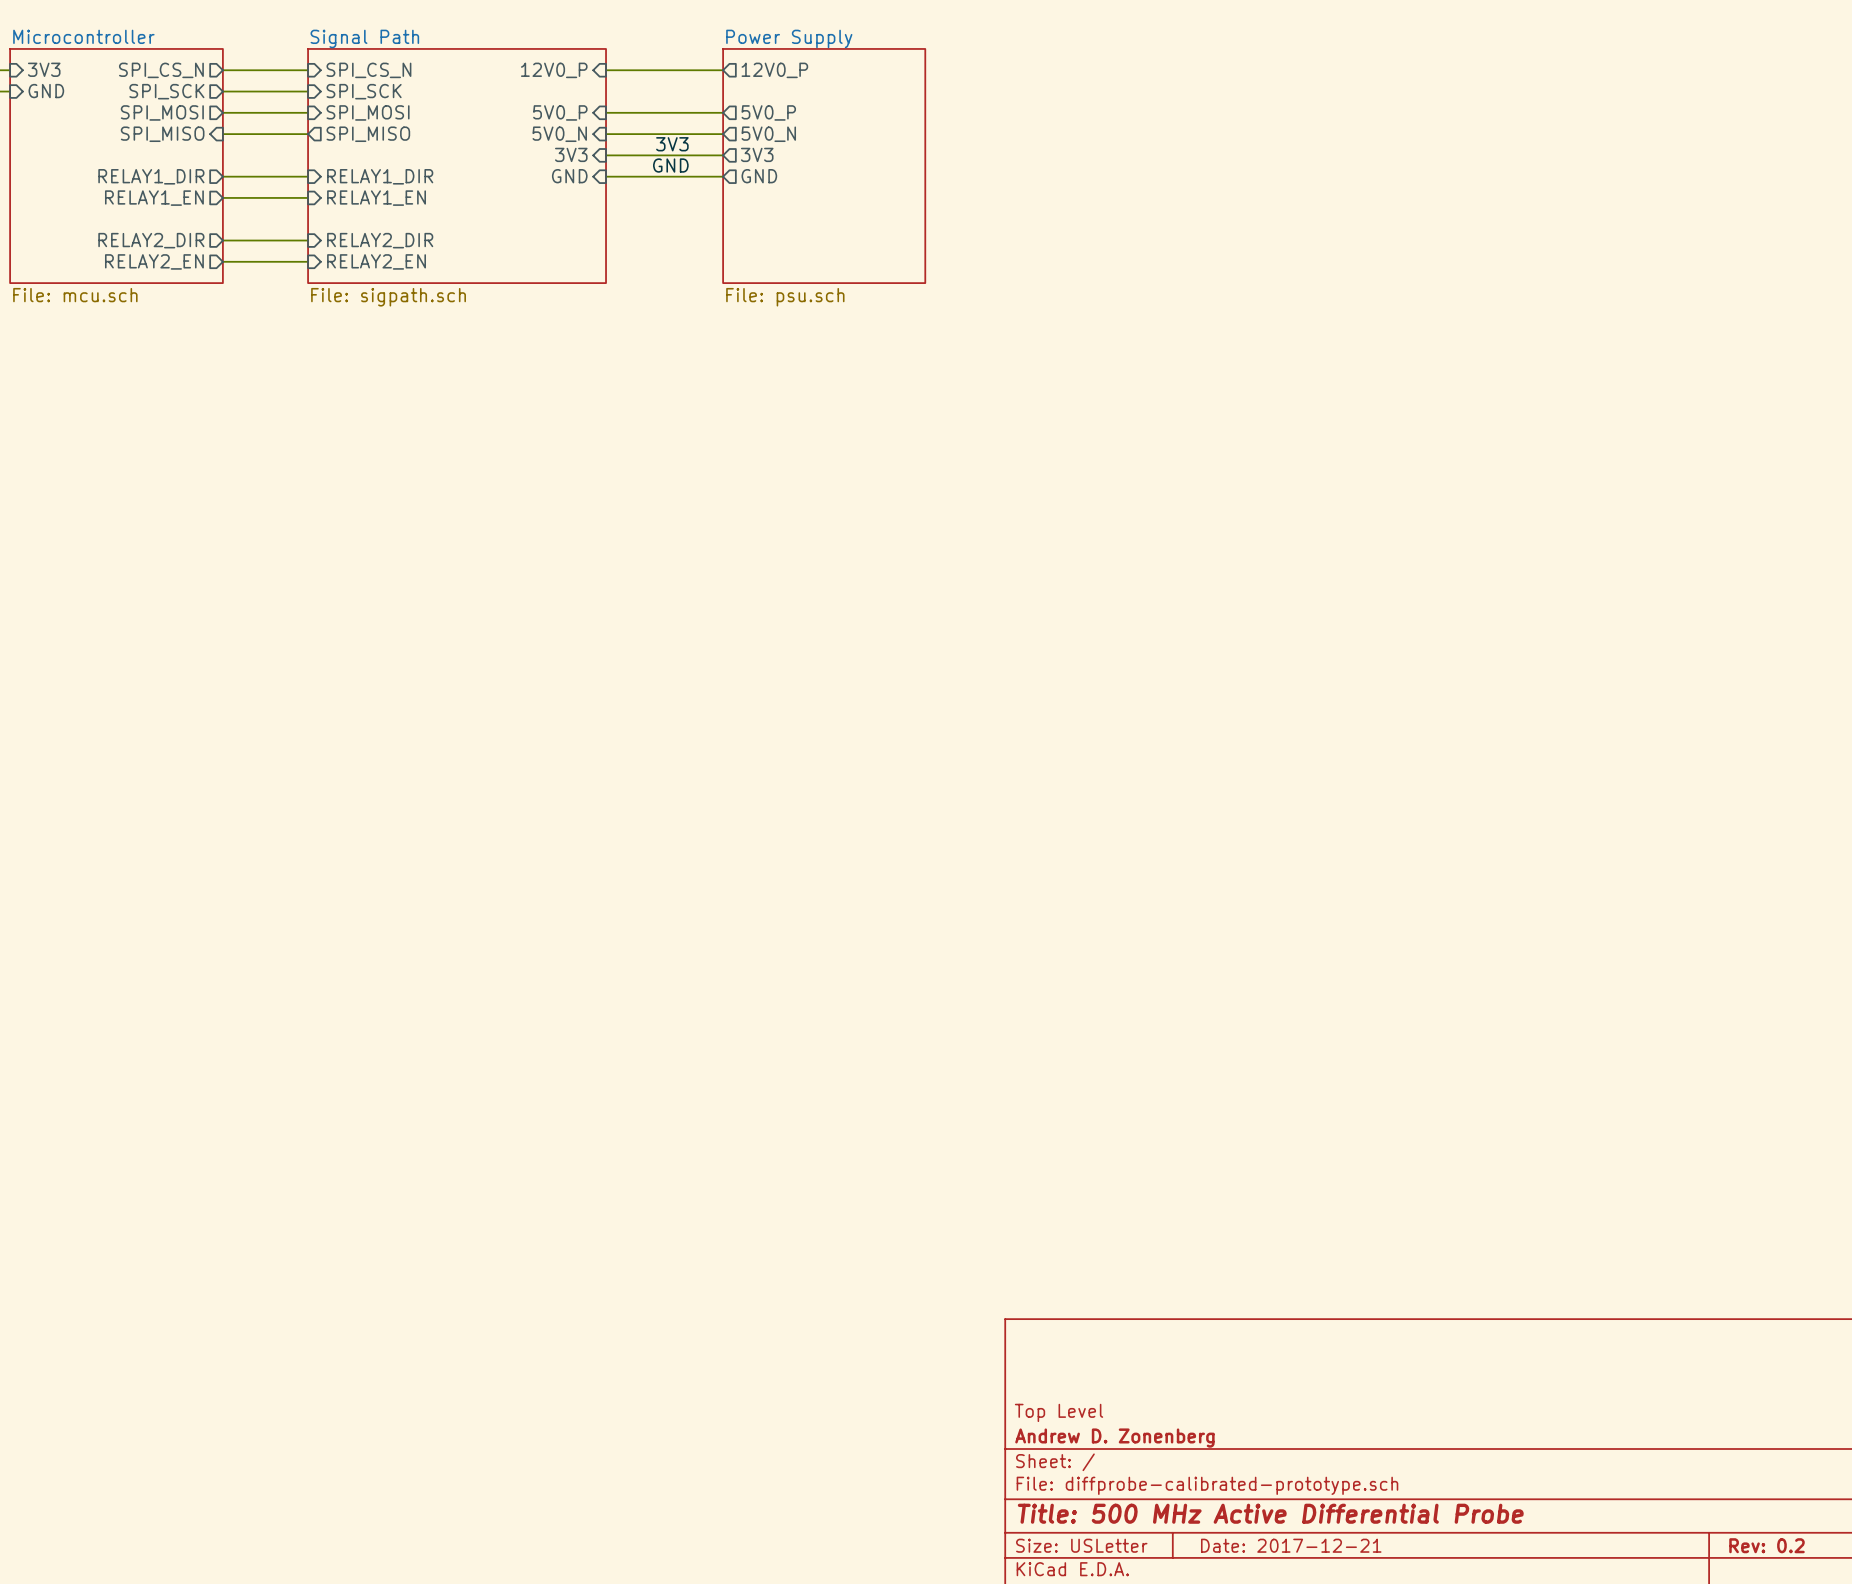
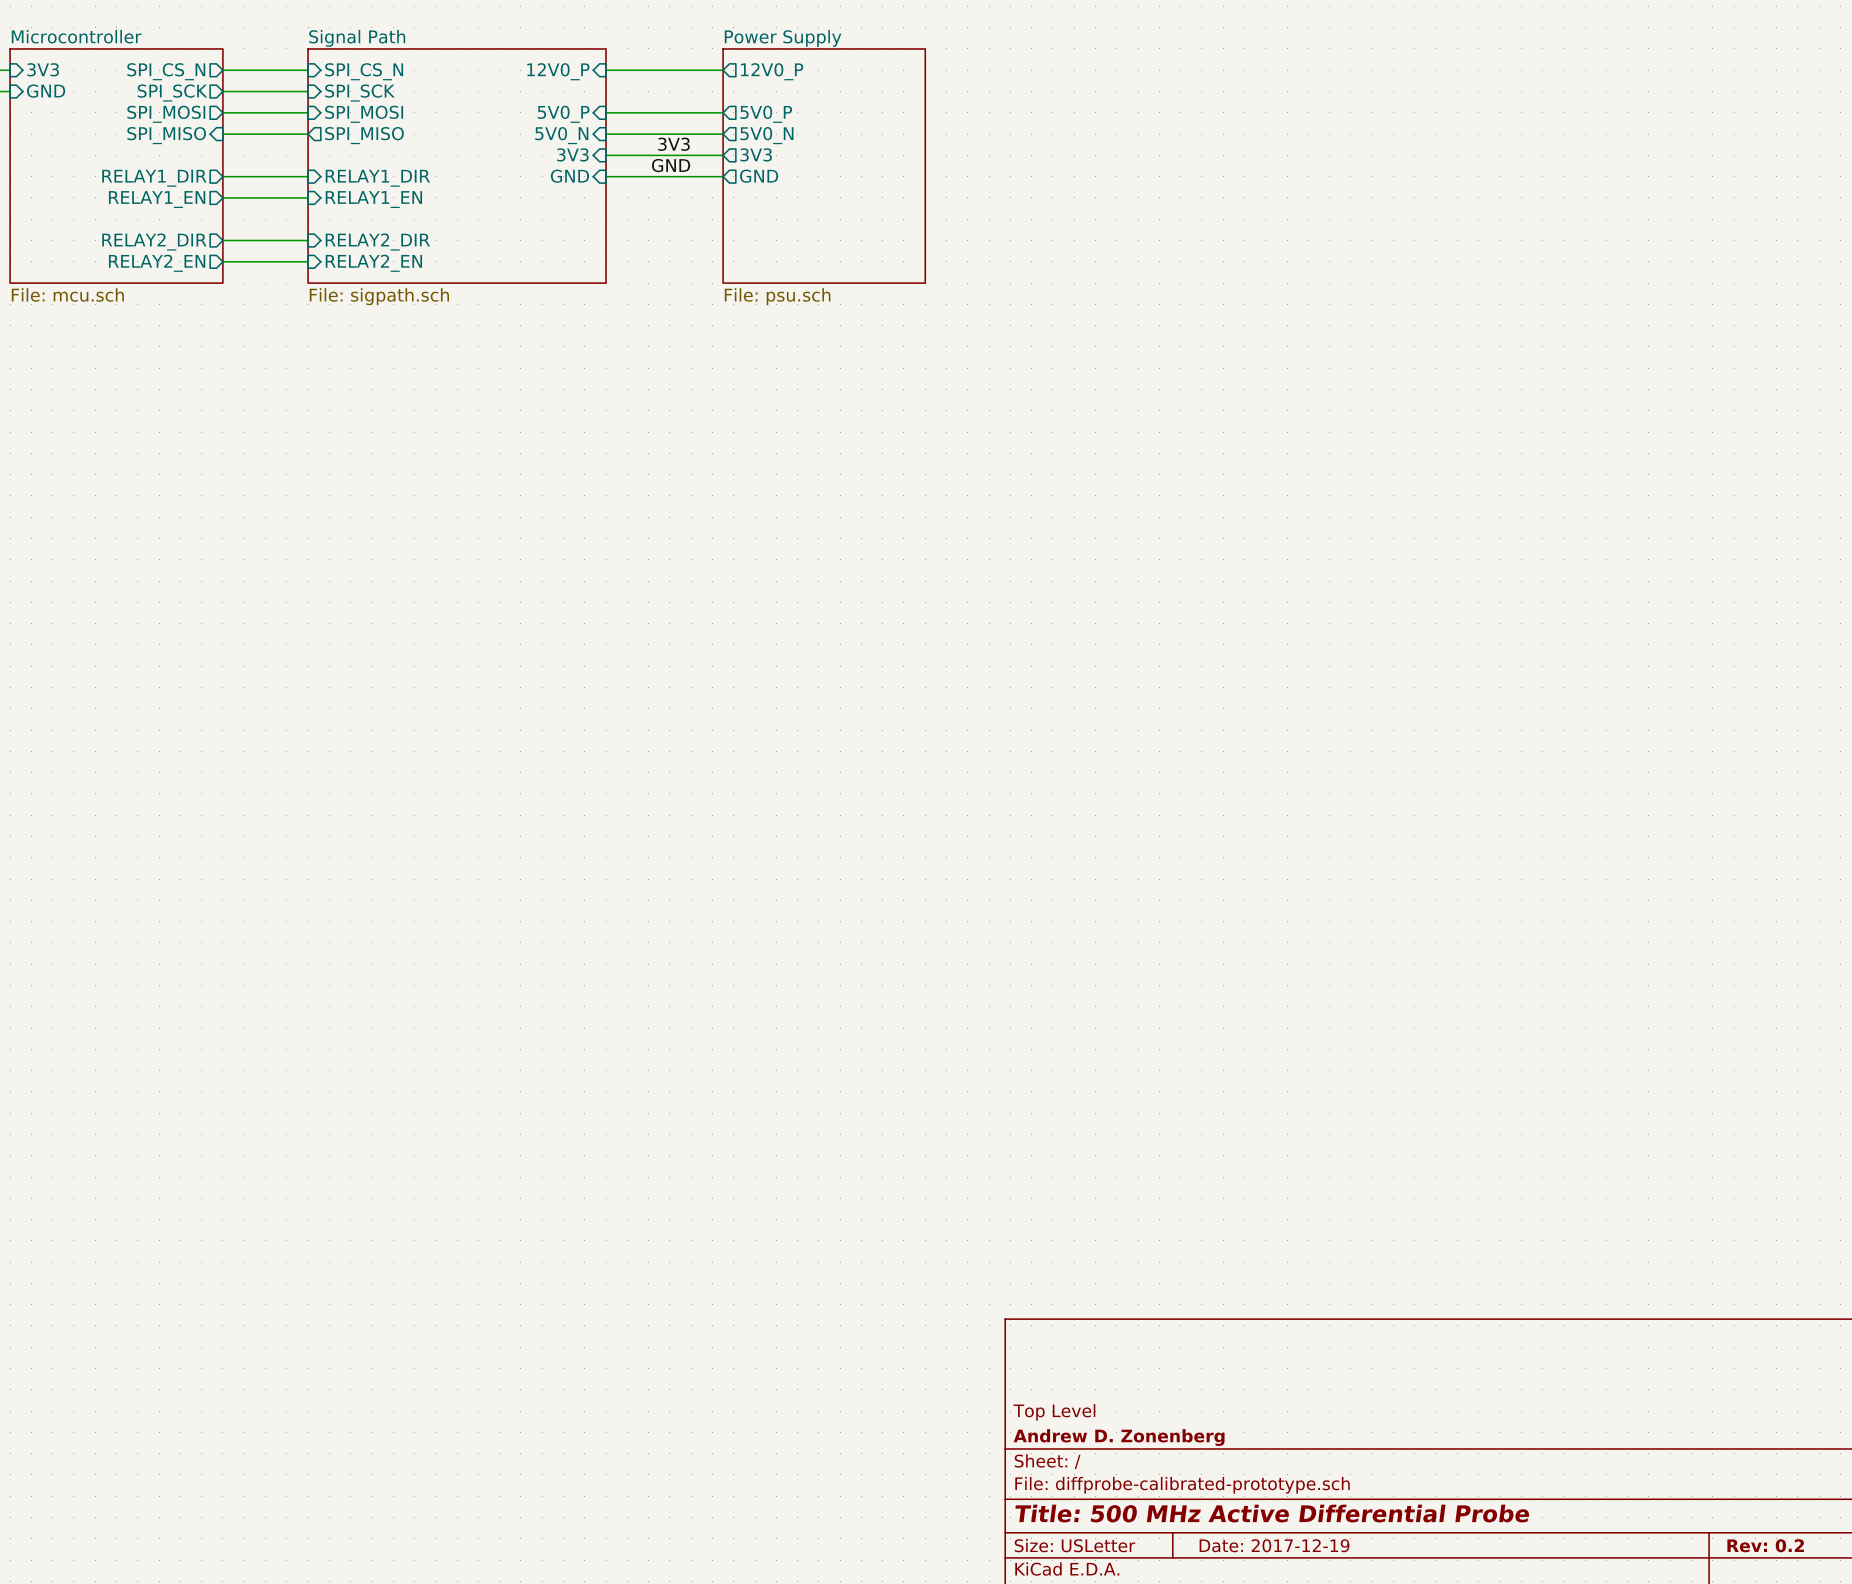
title block: Date: 2017-12-21 (1291, 1545) -> Date: 2017-12-19 (1274, 1545)

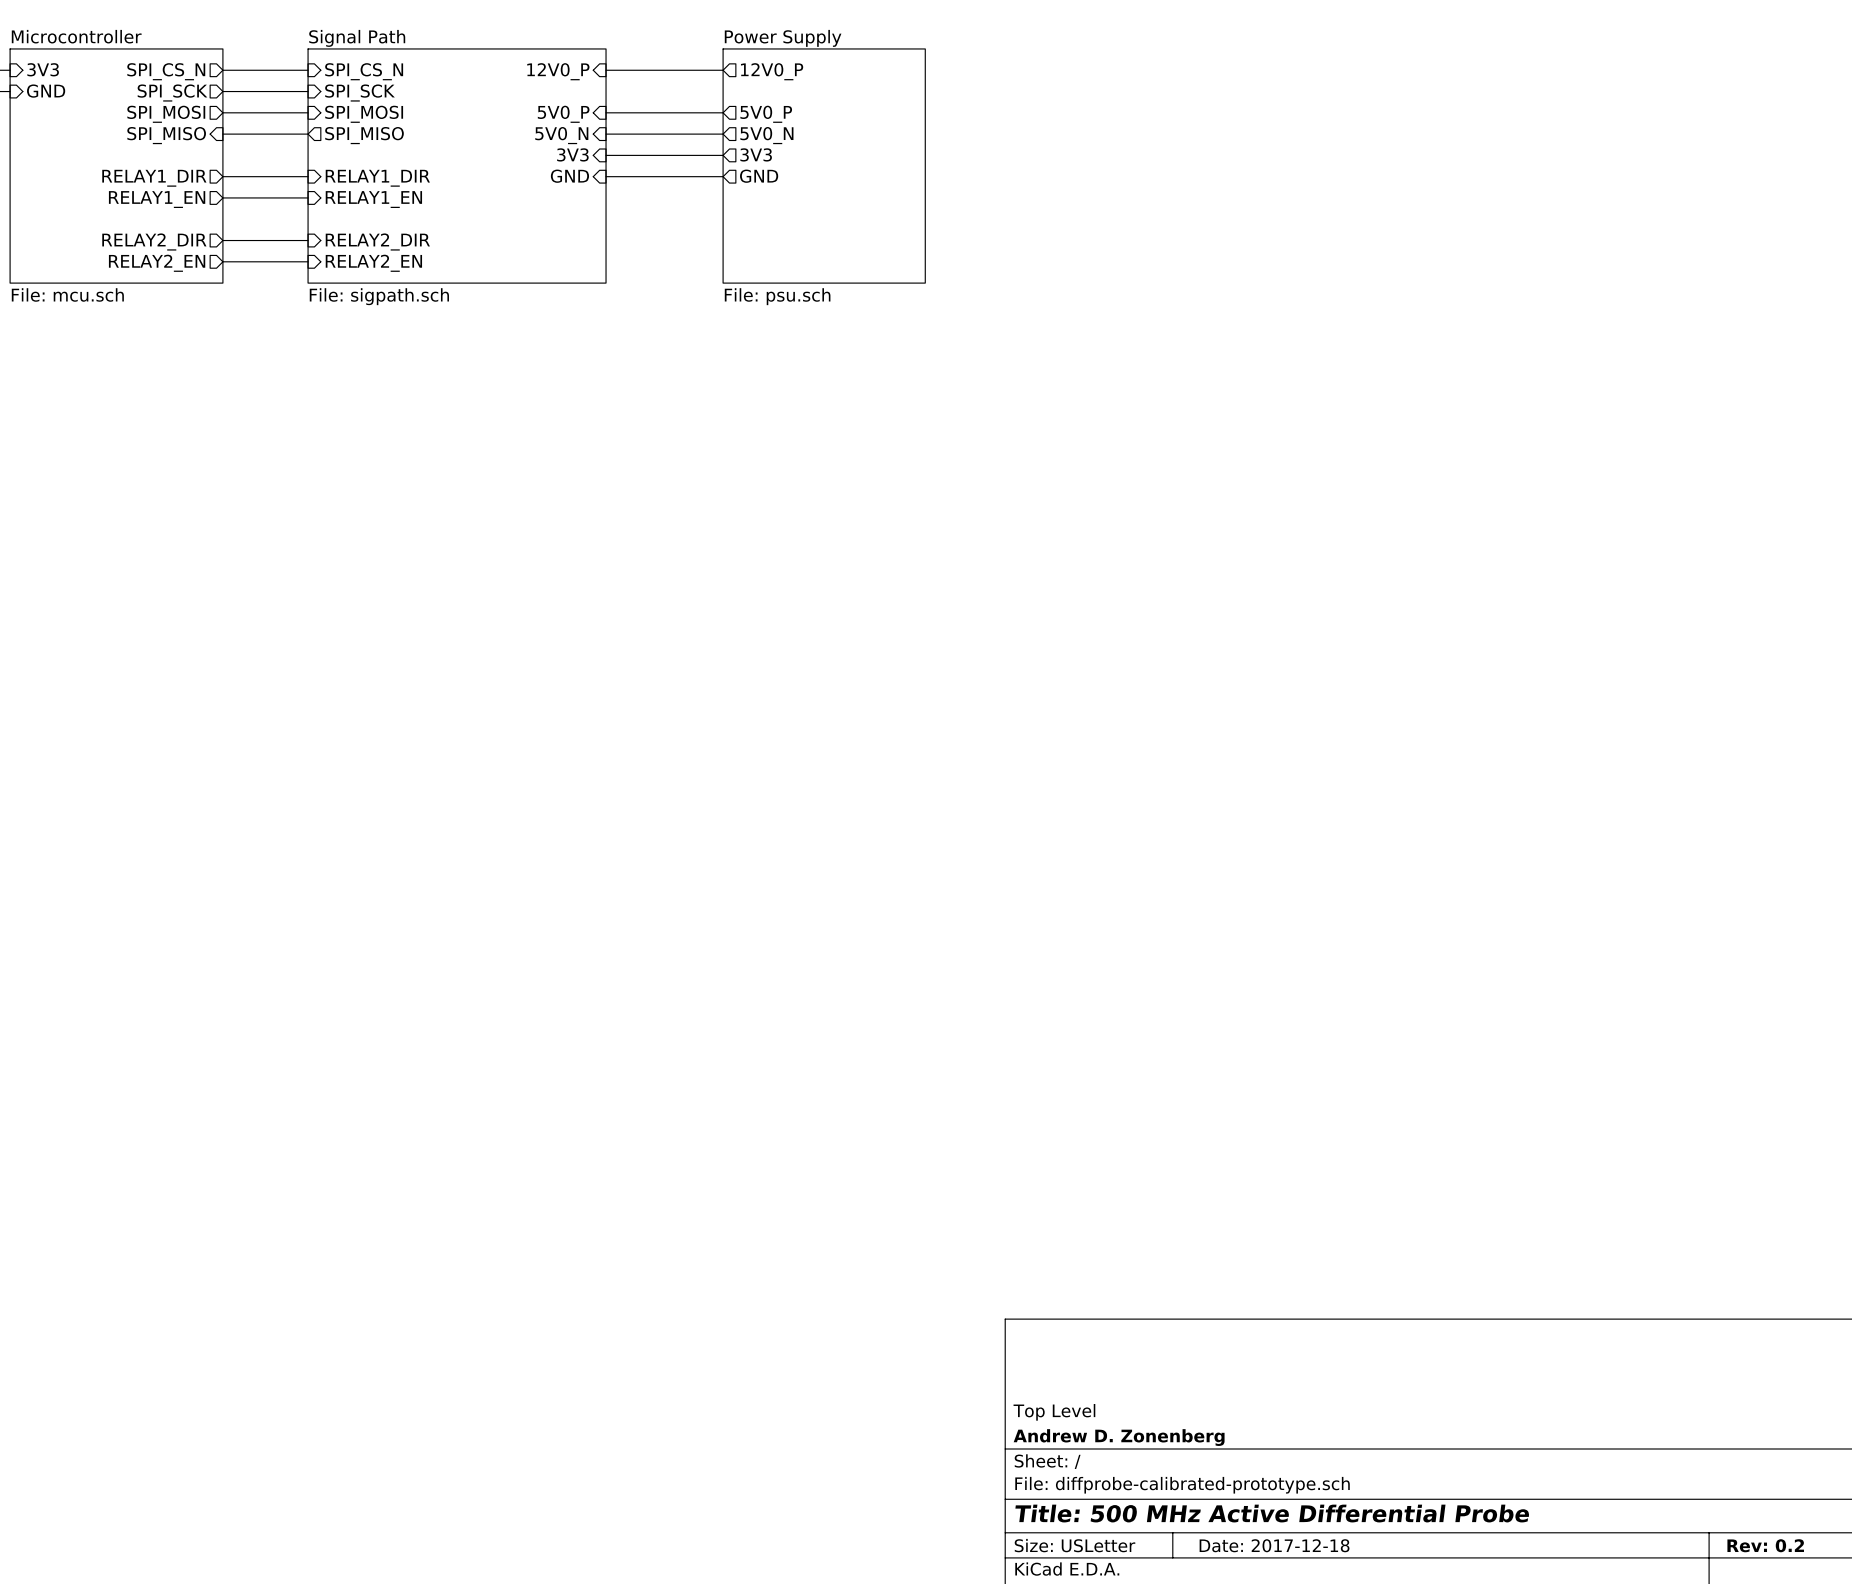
label: 3V3 (673, 144) -> none
label: GND (671, 165) -> none
title block: Date: 2017-12-19 (1274, 1545) -> Date: 2017-12-18 (1274, 1545)

